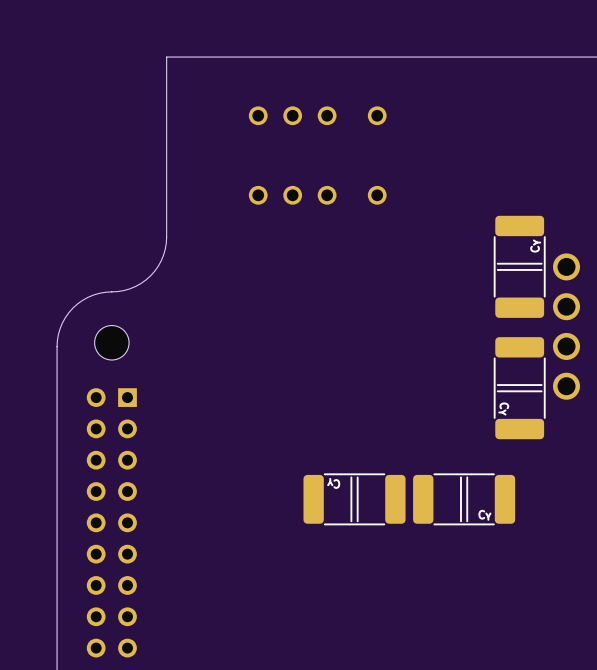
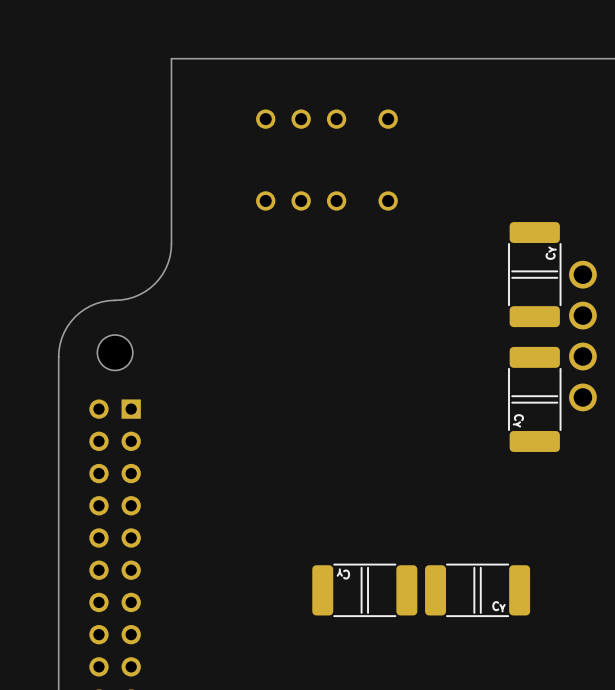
part: (354, 499) -> none
part: (464, 499) -> none
part: none -> (364, 590)
part: none -> (477, 590)

